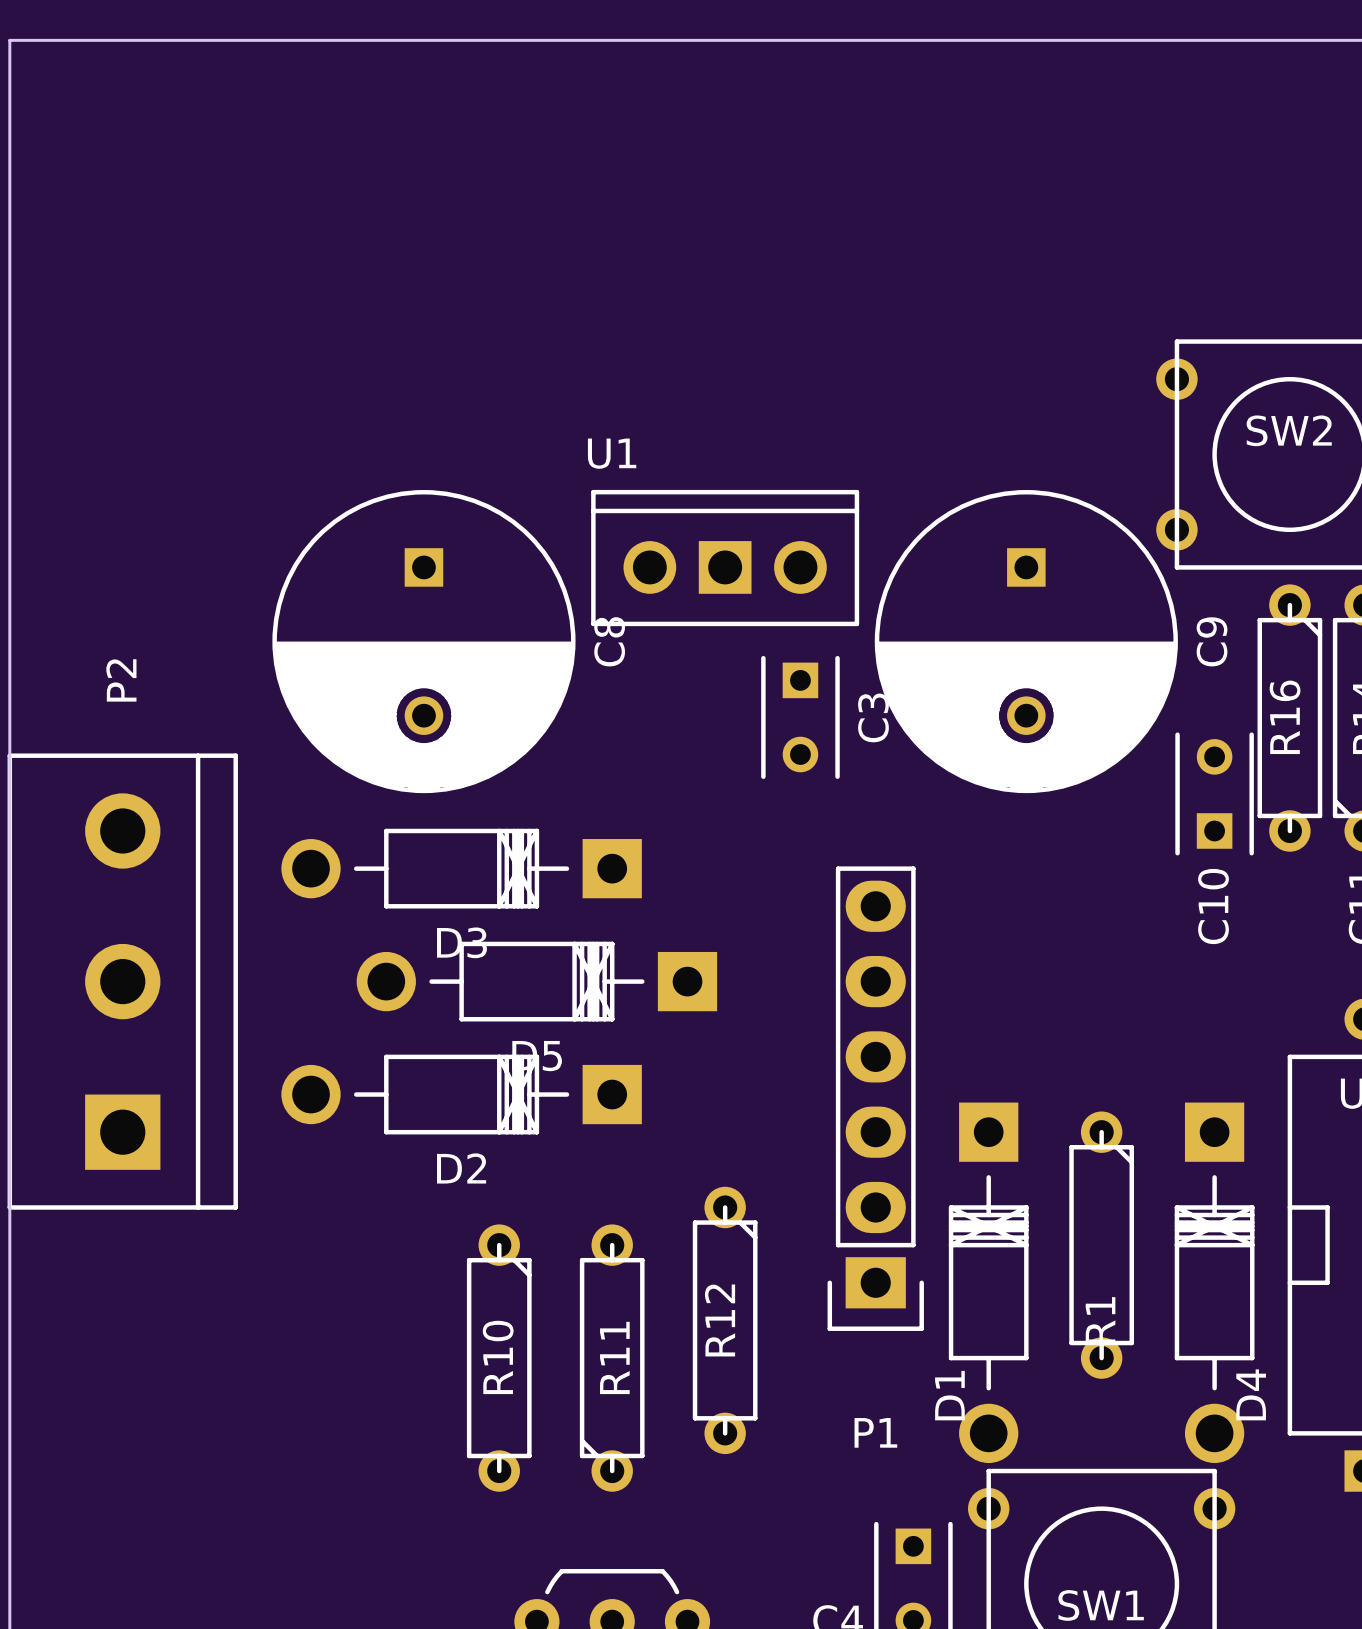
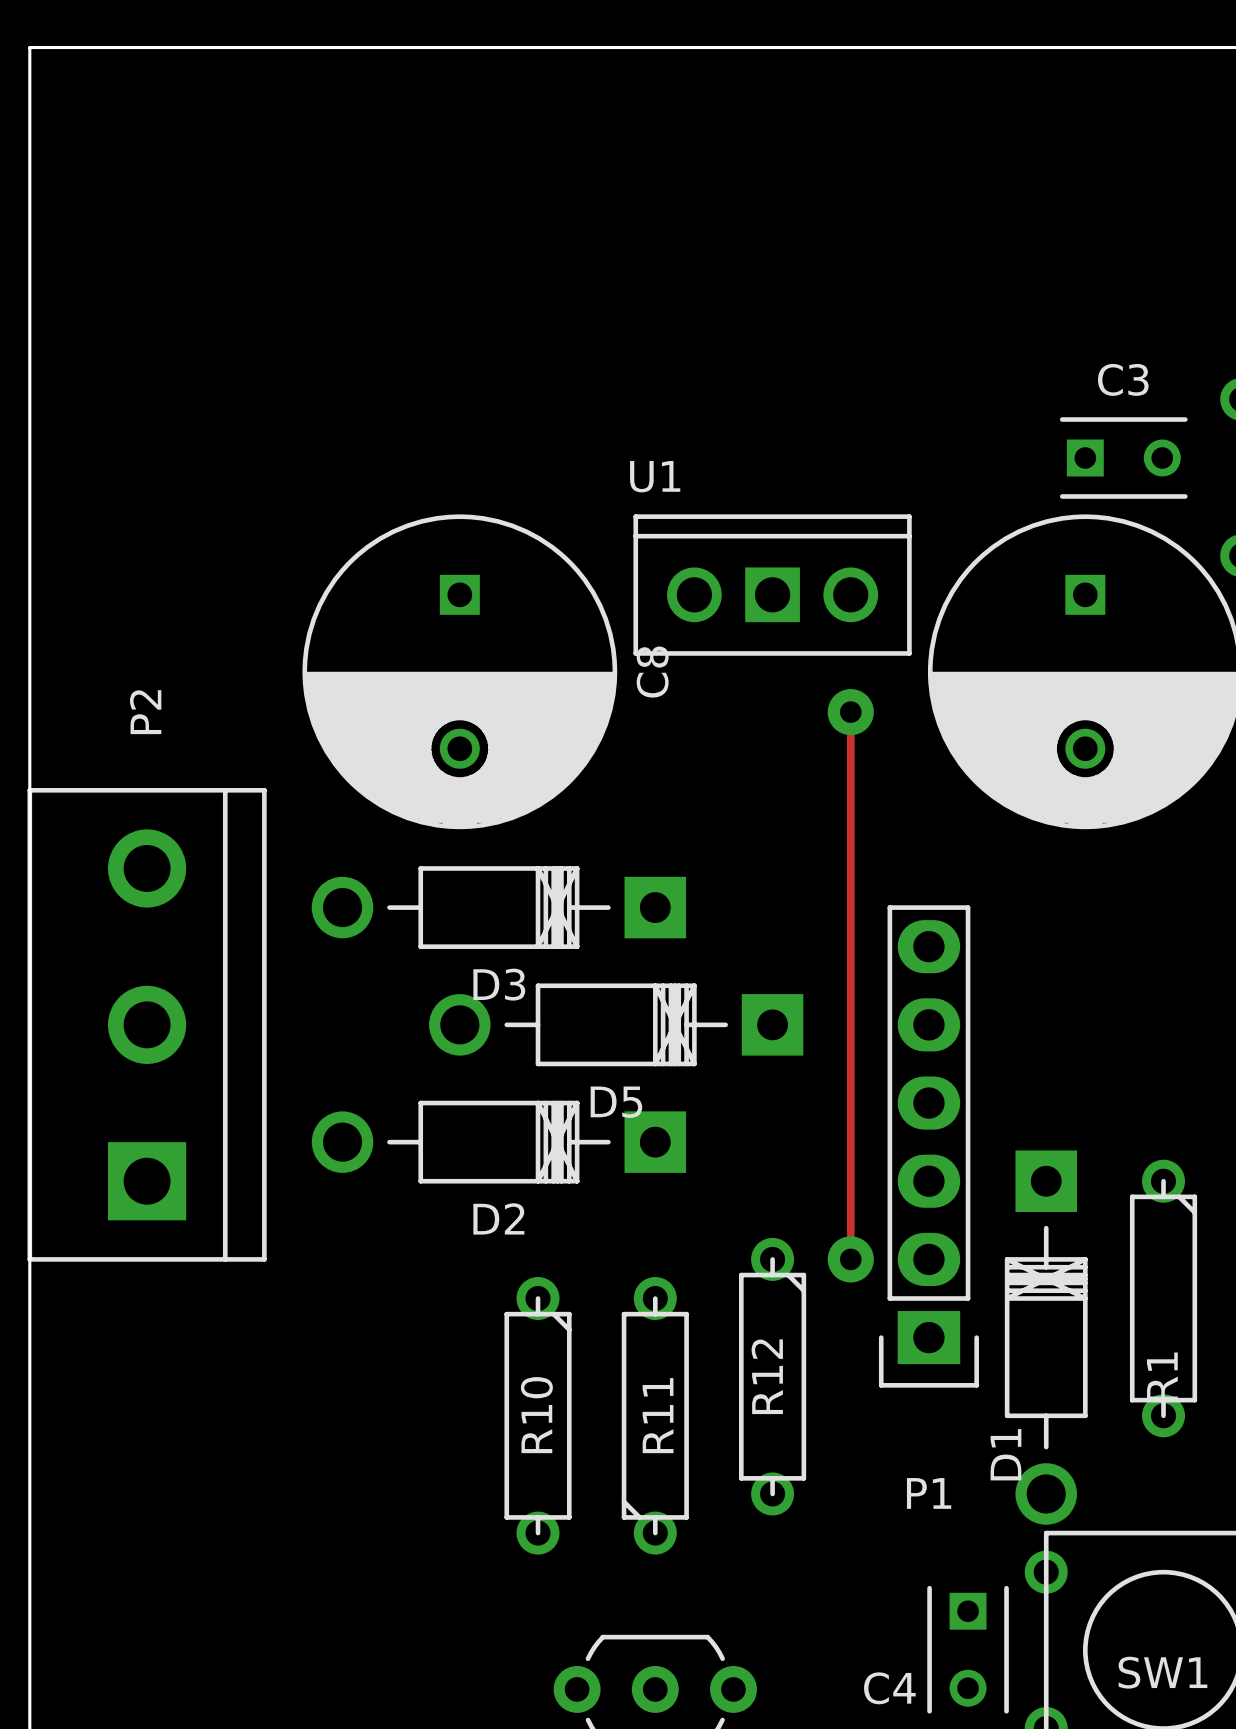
track: none -> (850, 712) (850, 1259)
via: none -> (850, 712)
C3 rotation: 0° (800, 717) -> 90° counterclockwise (1123, 458)
C3 position: (800, 717) -> (1123, 458)
D5 position: (536, 981) -> (616, 1024)
via: none -> (850, 1259)

